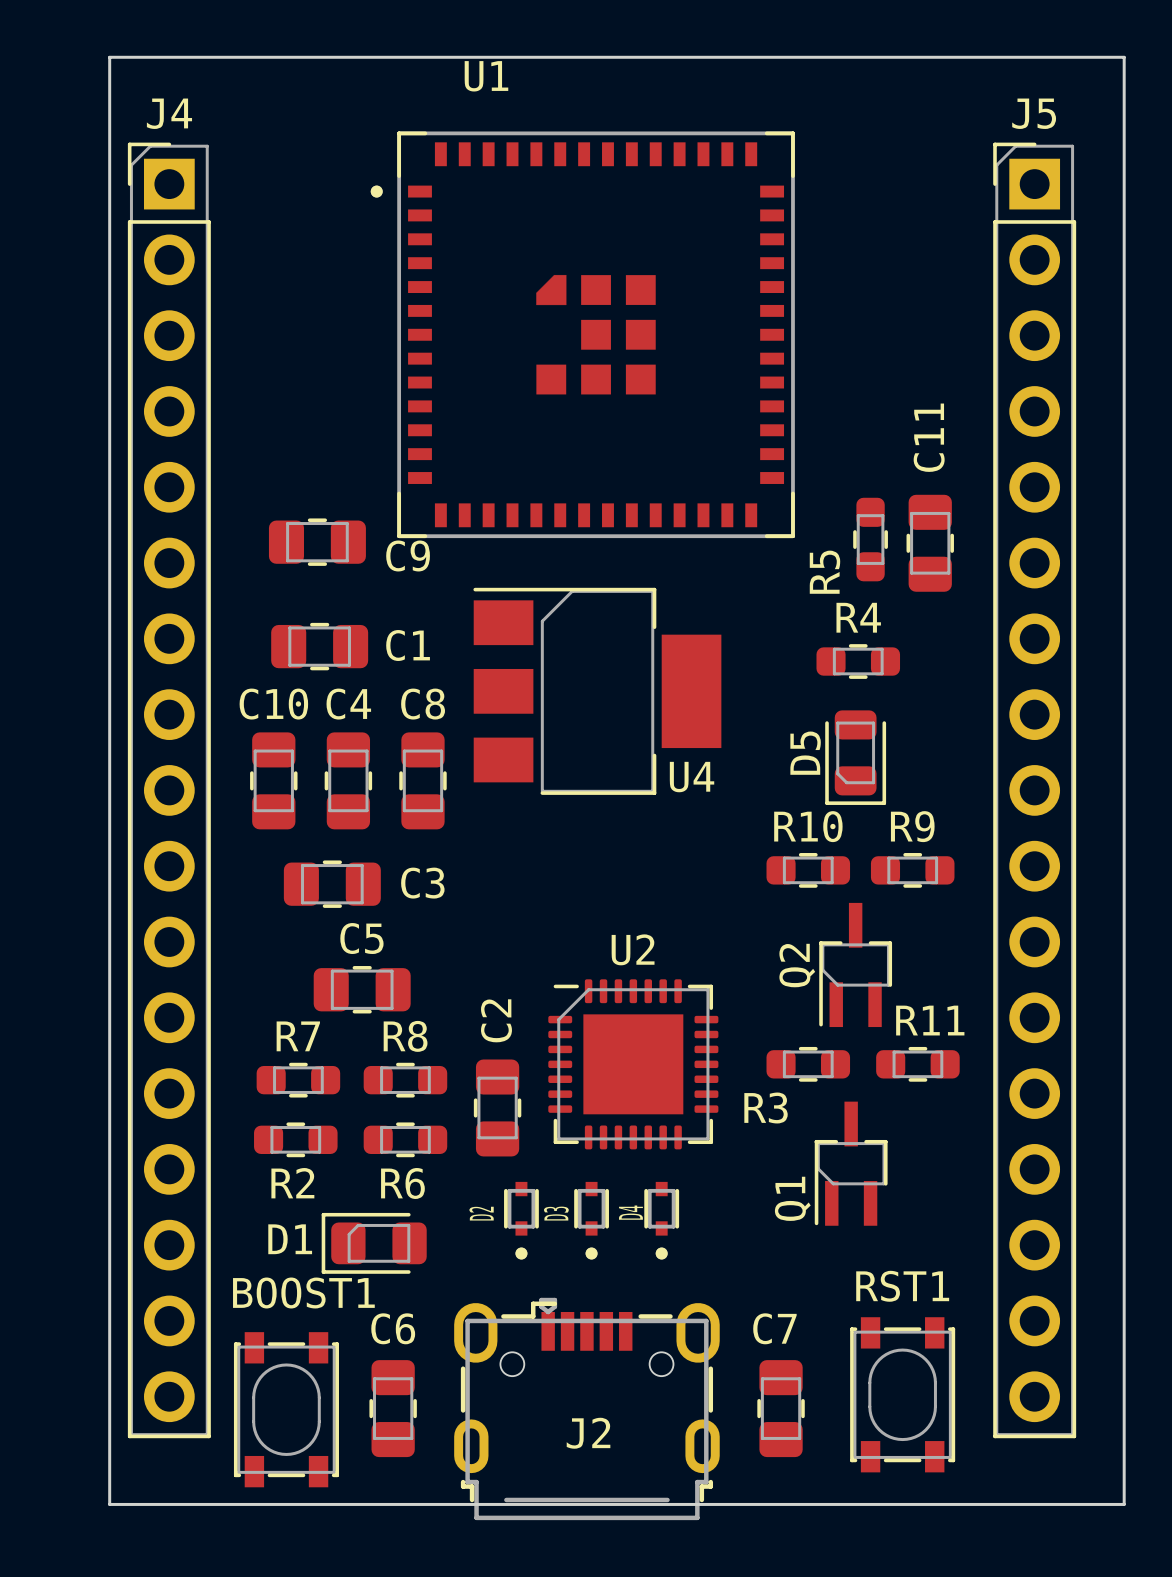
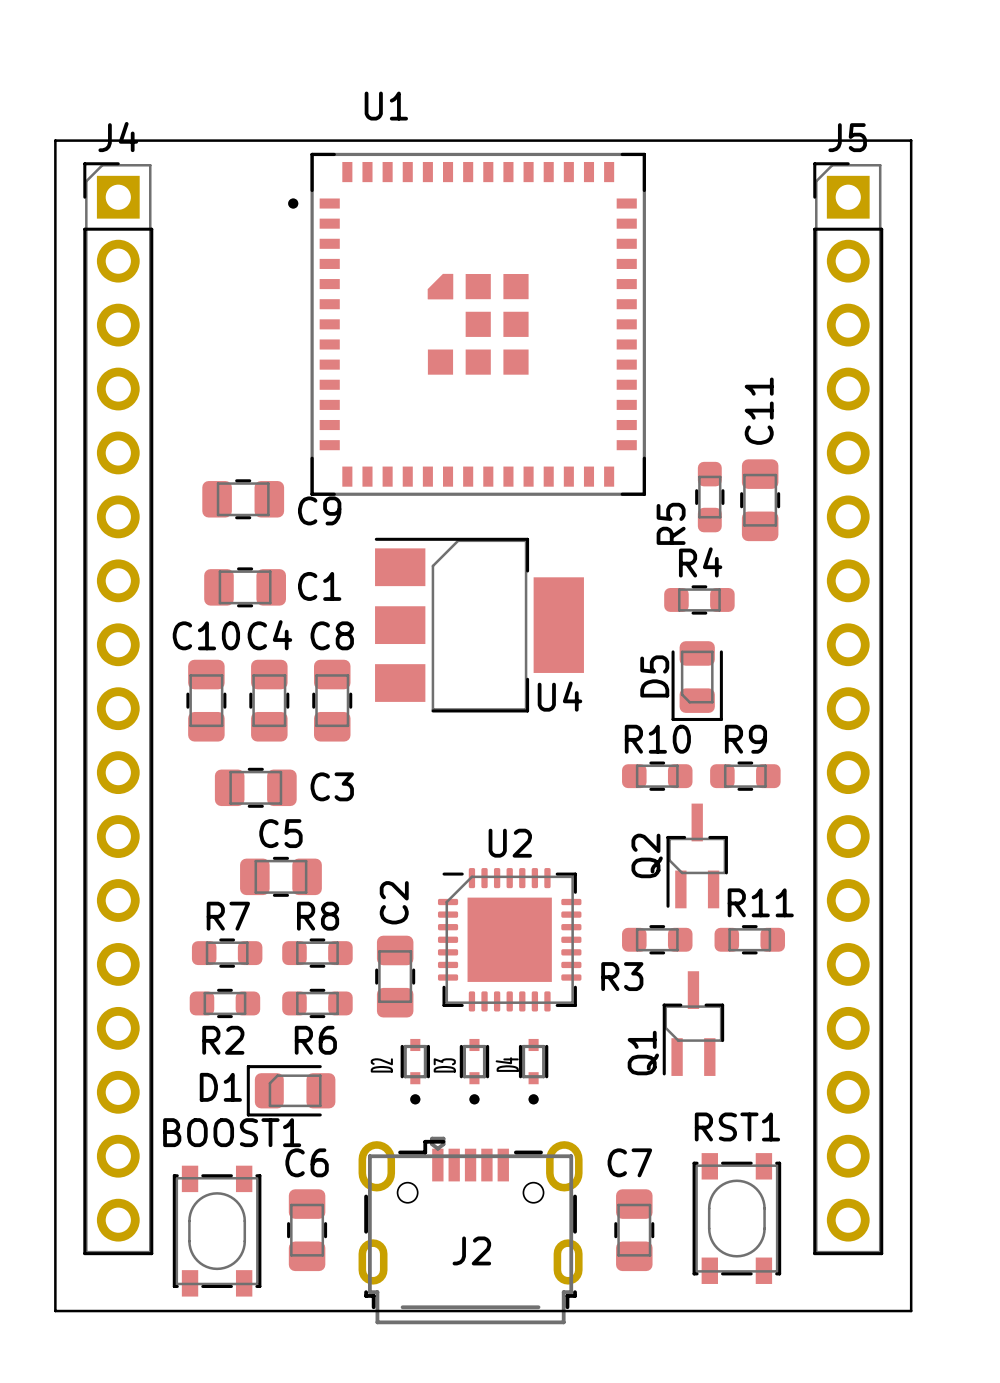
board edge: (109, 1504) (109, 57) (1124, 57) (1124, 1504) (1109, 1504) -> (67, 1311) (55, 1311) (55, 140) (911, 140) (911, 1311)

